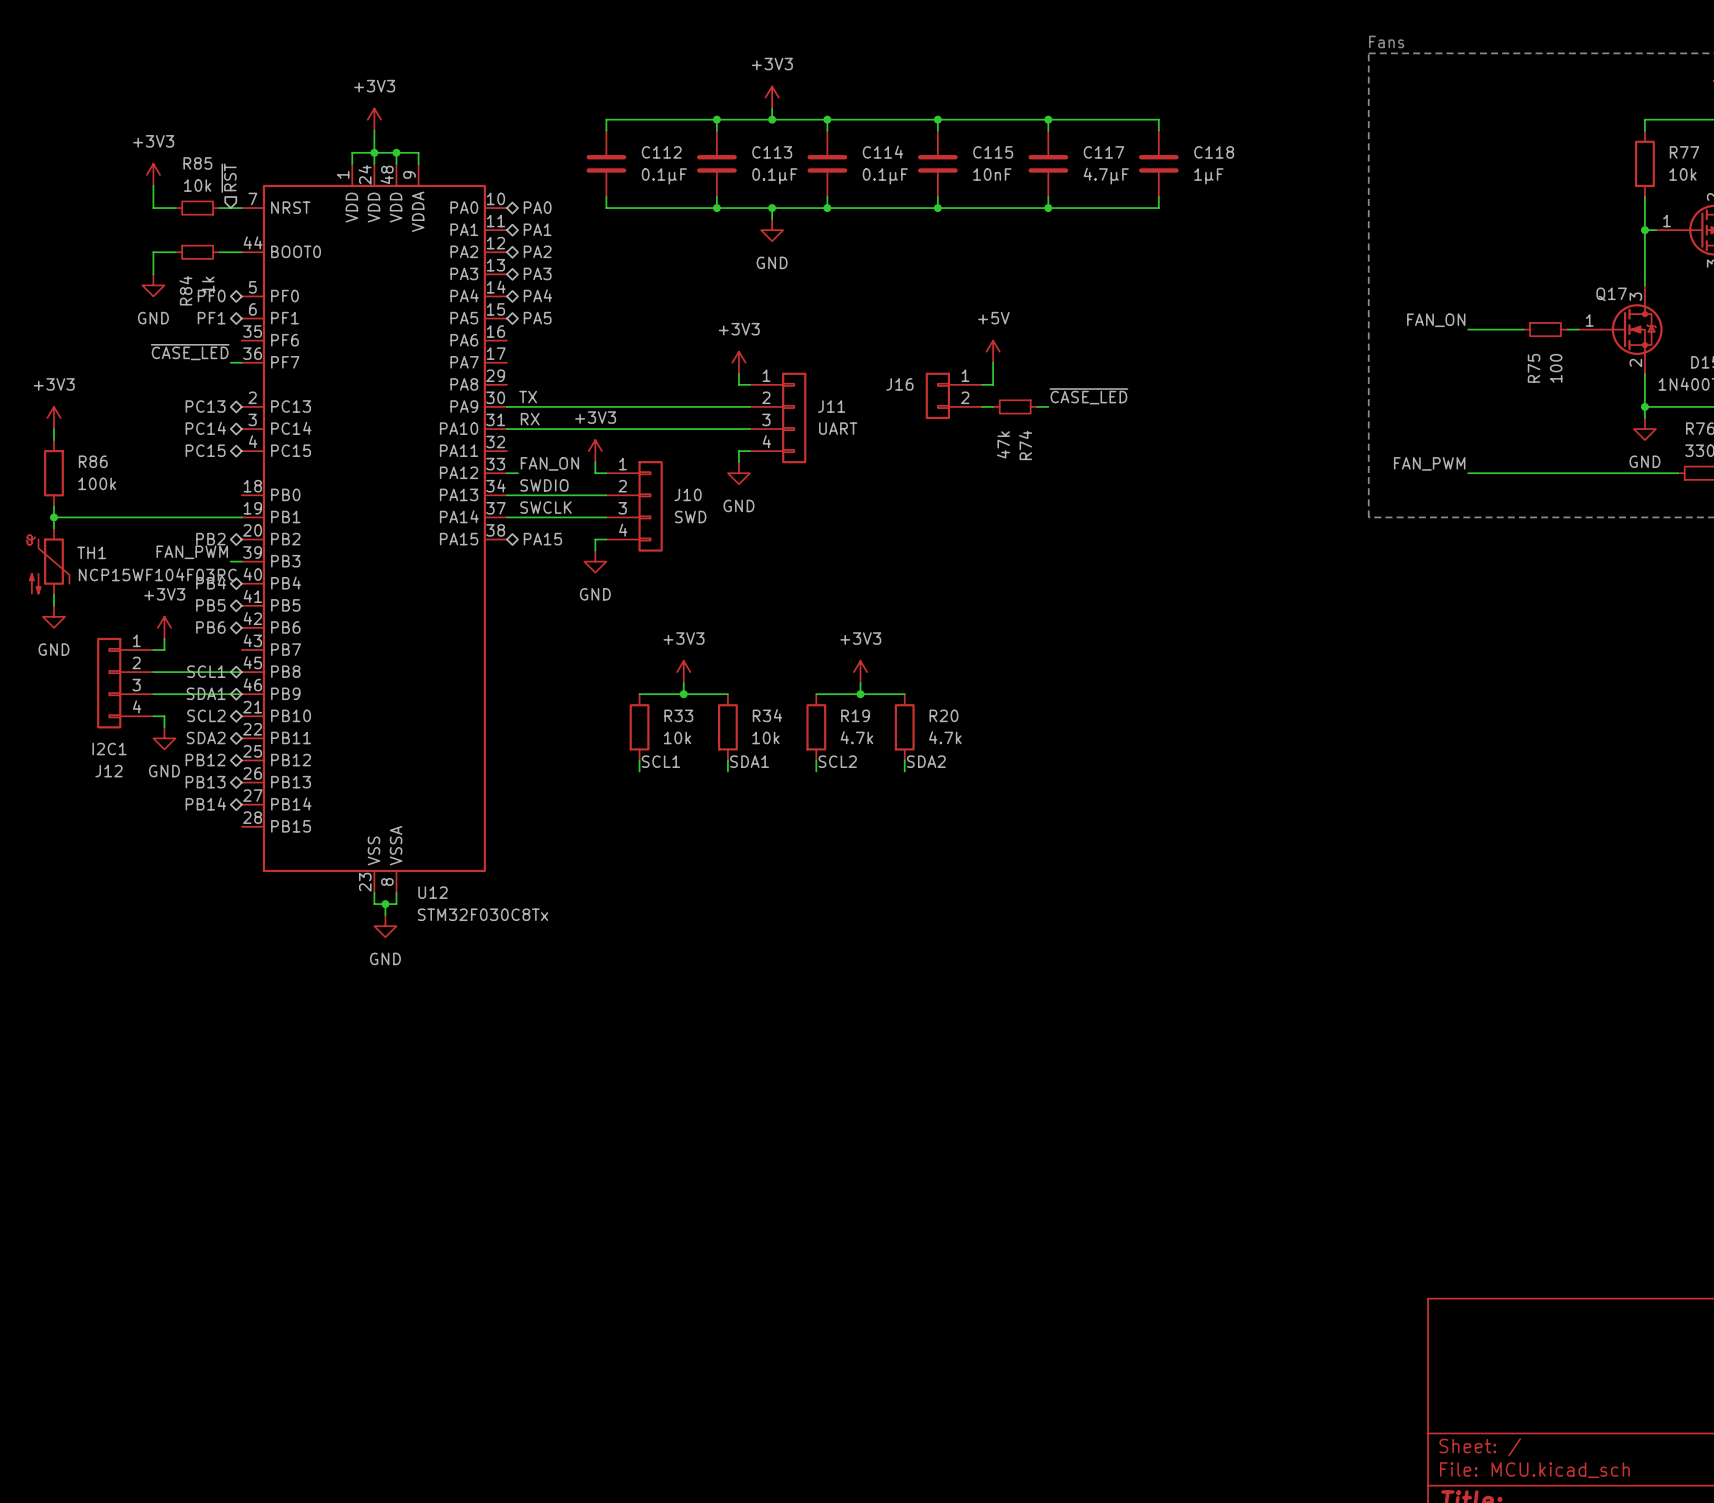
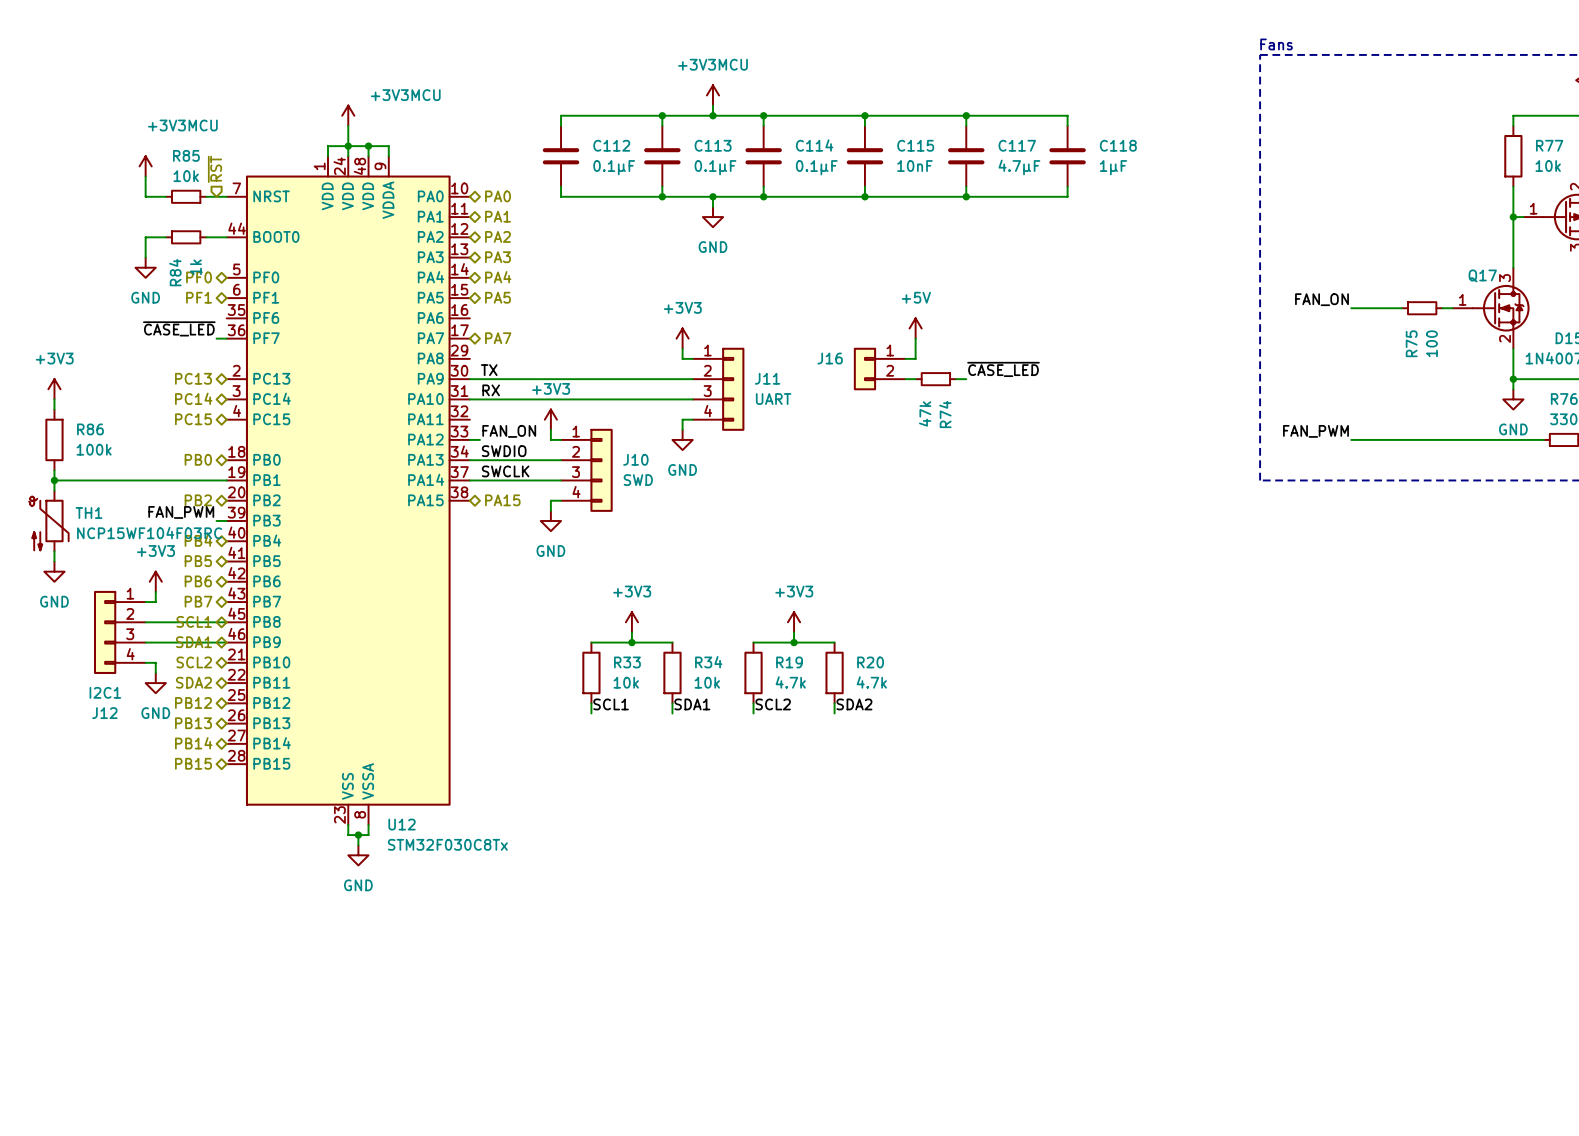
power symbol: +3V3 (772, 97) -> +3V3MCU (712, 95)
power symbol: +3V3 (374, 119) -> +3V3MCU (348, 115)
power symbol: +3V3 (153, 174) -> +3V3MCU (145, 166)
hierarchical label: none -> PA7 (498, 338)
hierarchical label: none -> PB0 (198, 459)
hierarchical label: none -> PB7 (198, 601)
hierarchical label: none -> PB15 (193, 763)

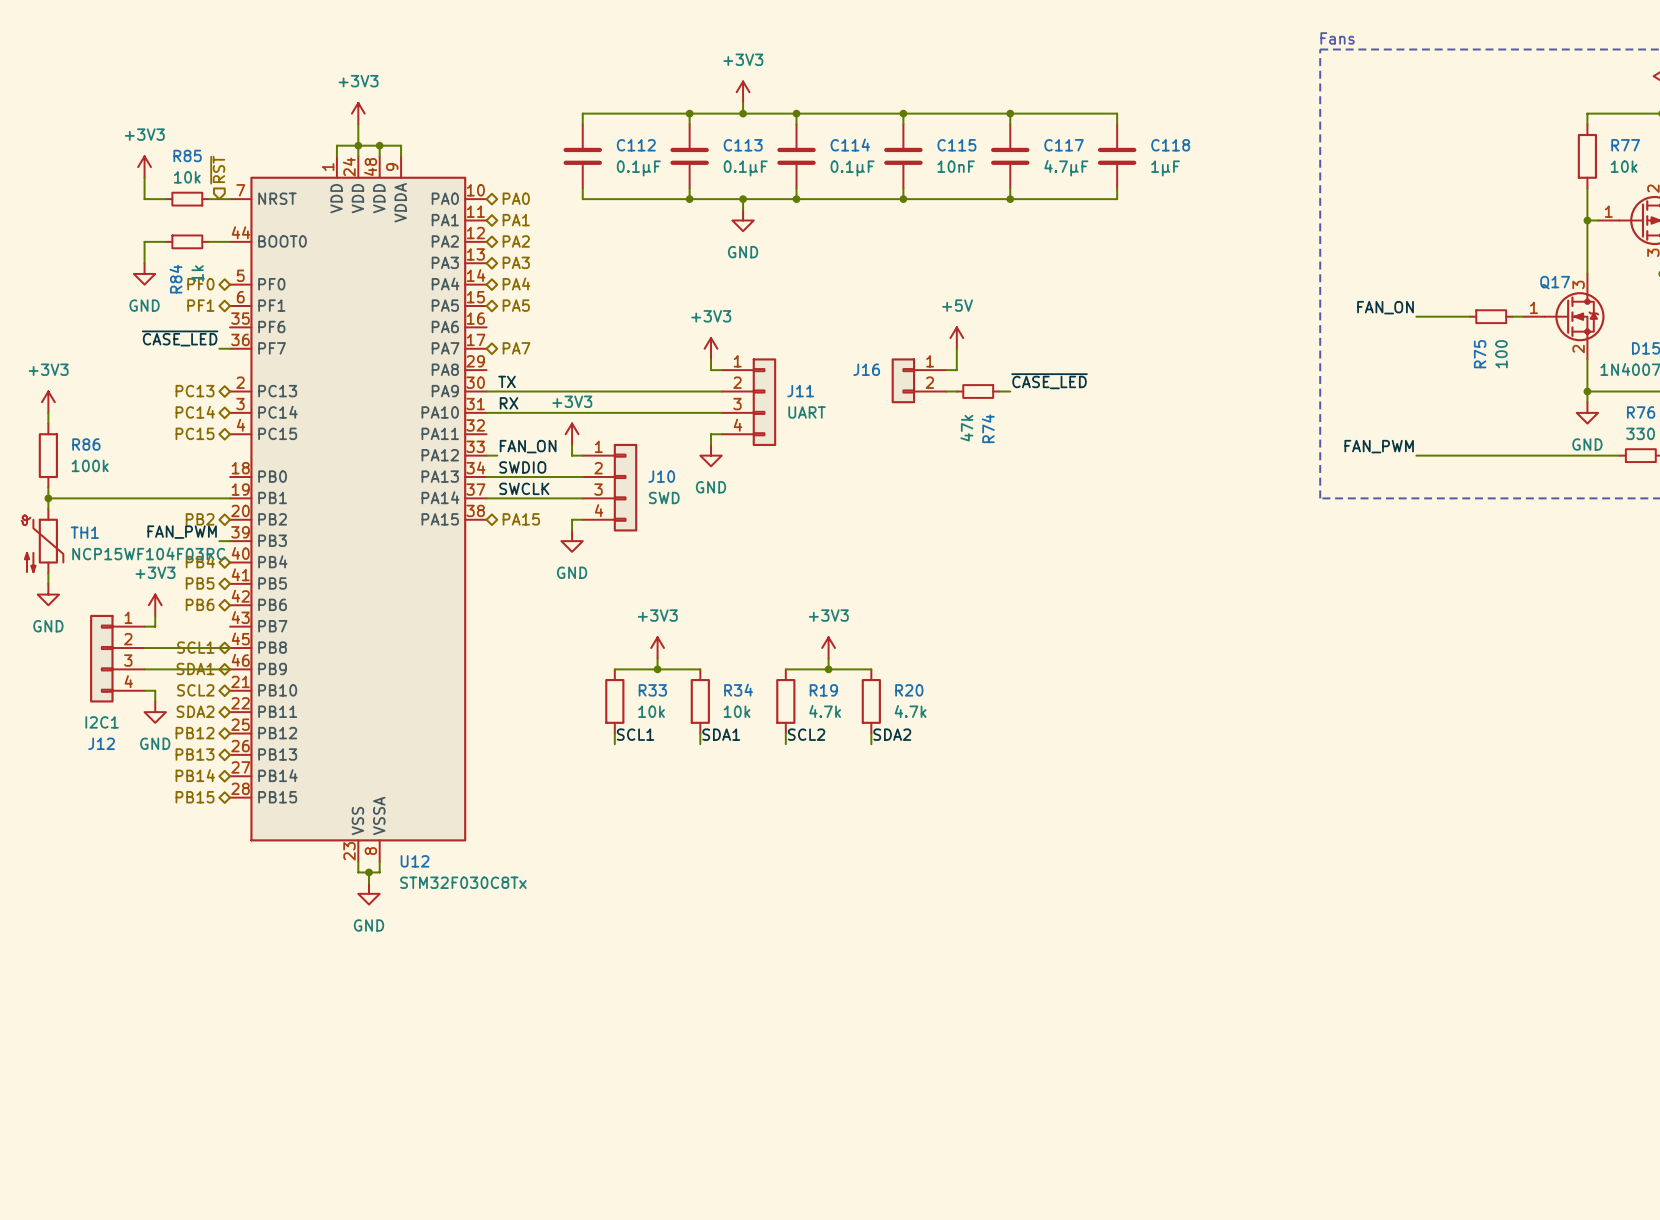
power symbol: +3V3MCU (712, 95) -> +3V3 (743, 92)
power symbol: +3V3MCU (348, 115) -> +3V3 (358, 113)
power symbol: +3V3MCU (145, 166) -> +3V3 (144, 167)
hierarchical label: PB0 (198, 459) -> none
hierarchical label: PB7 (198, 601) -> none

